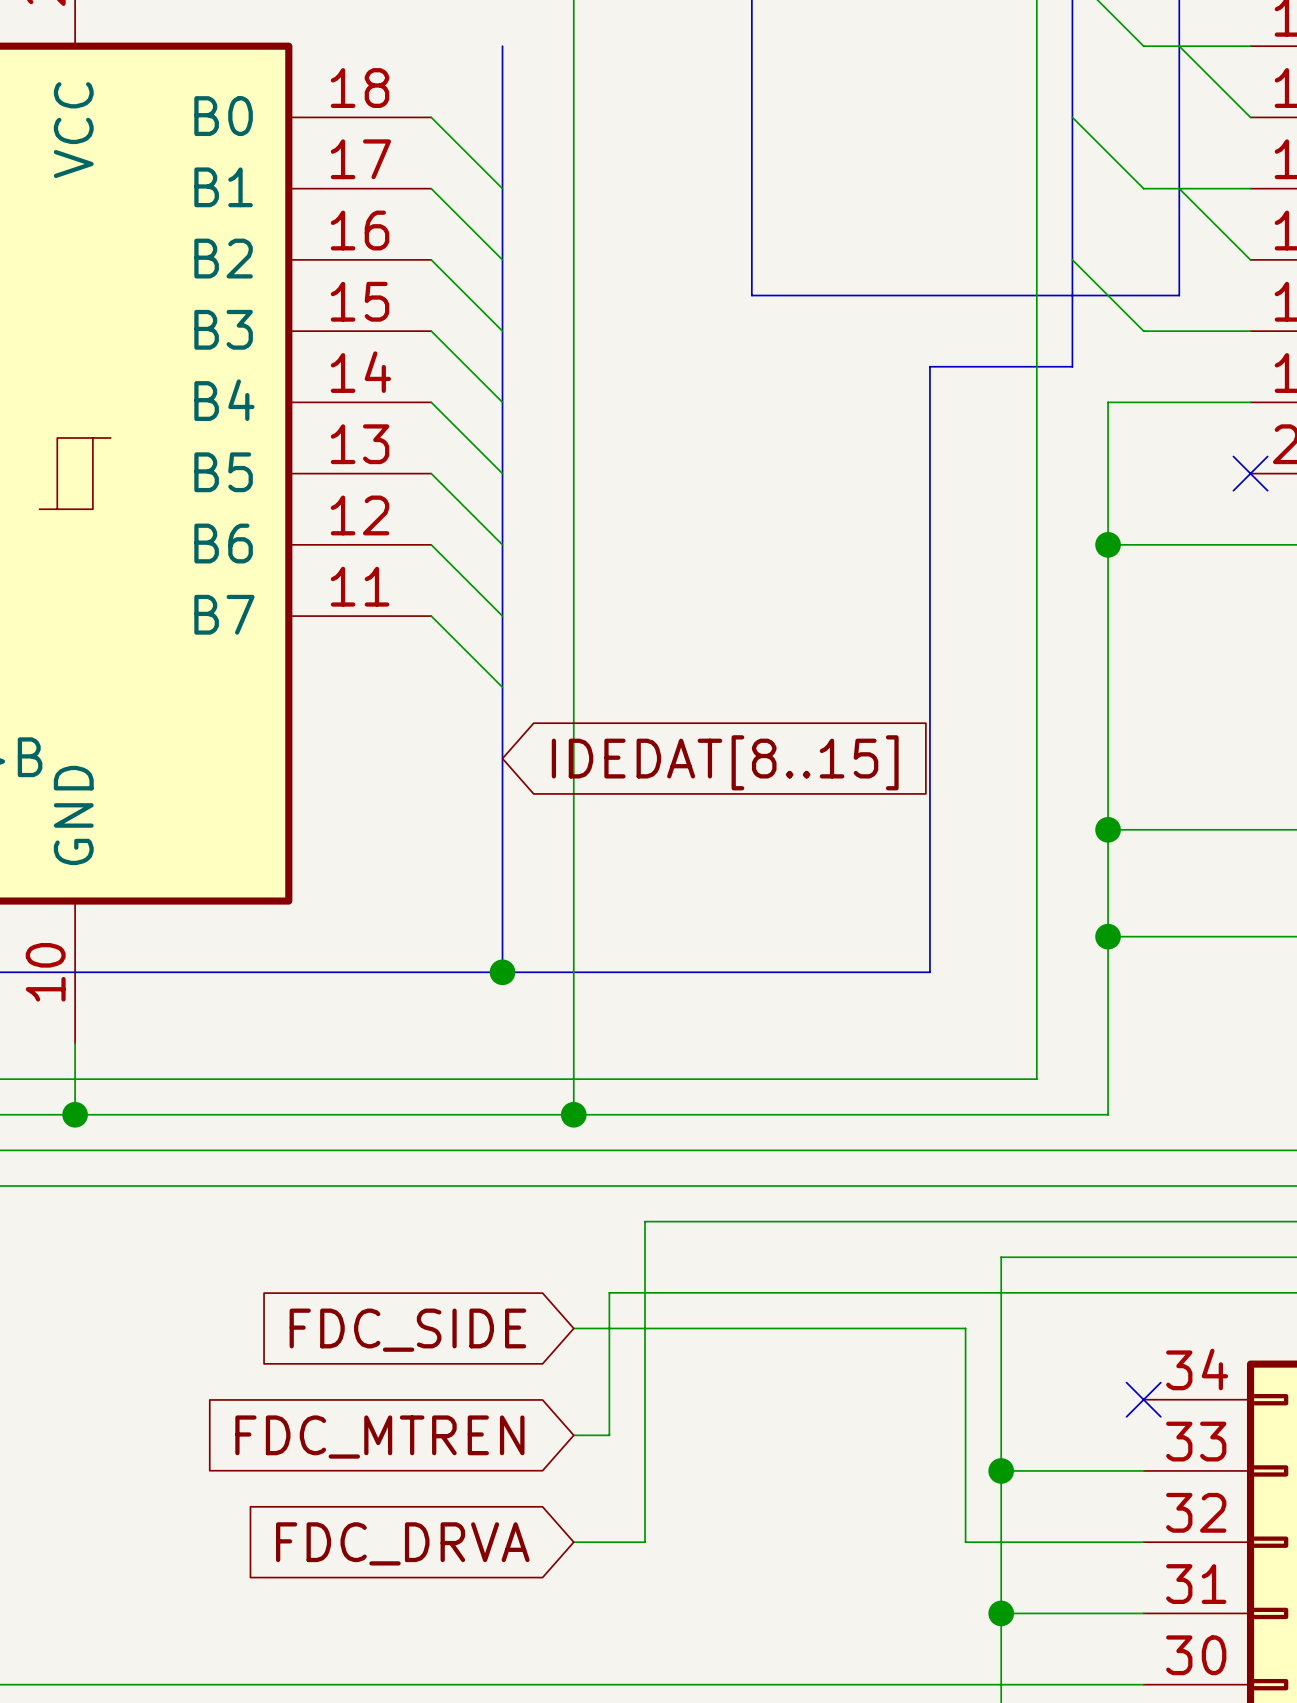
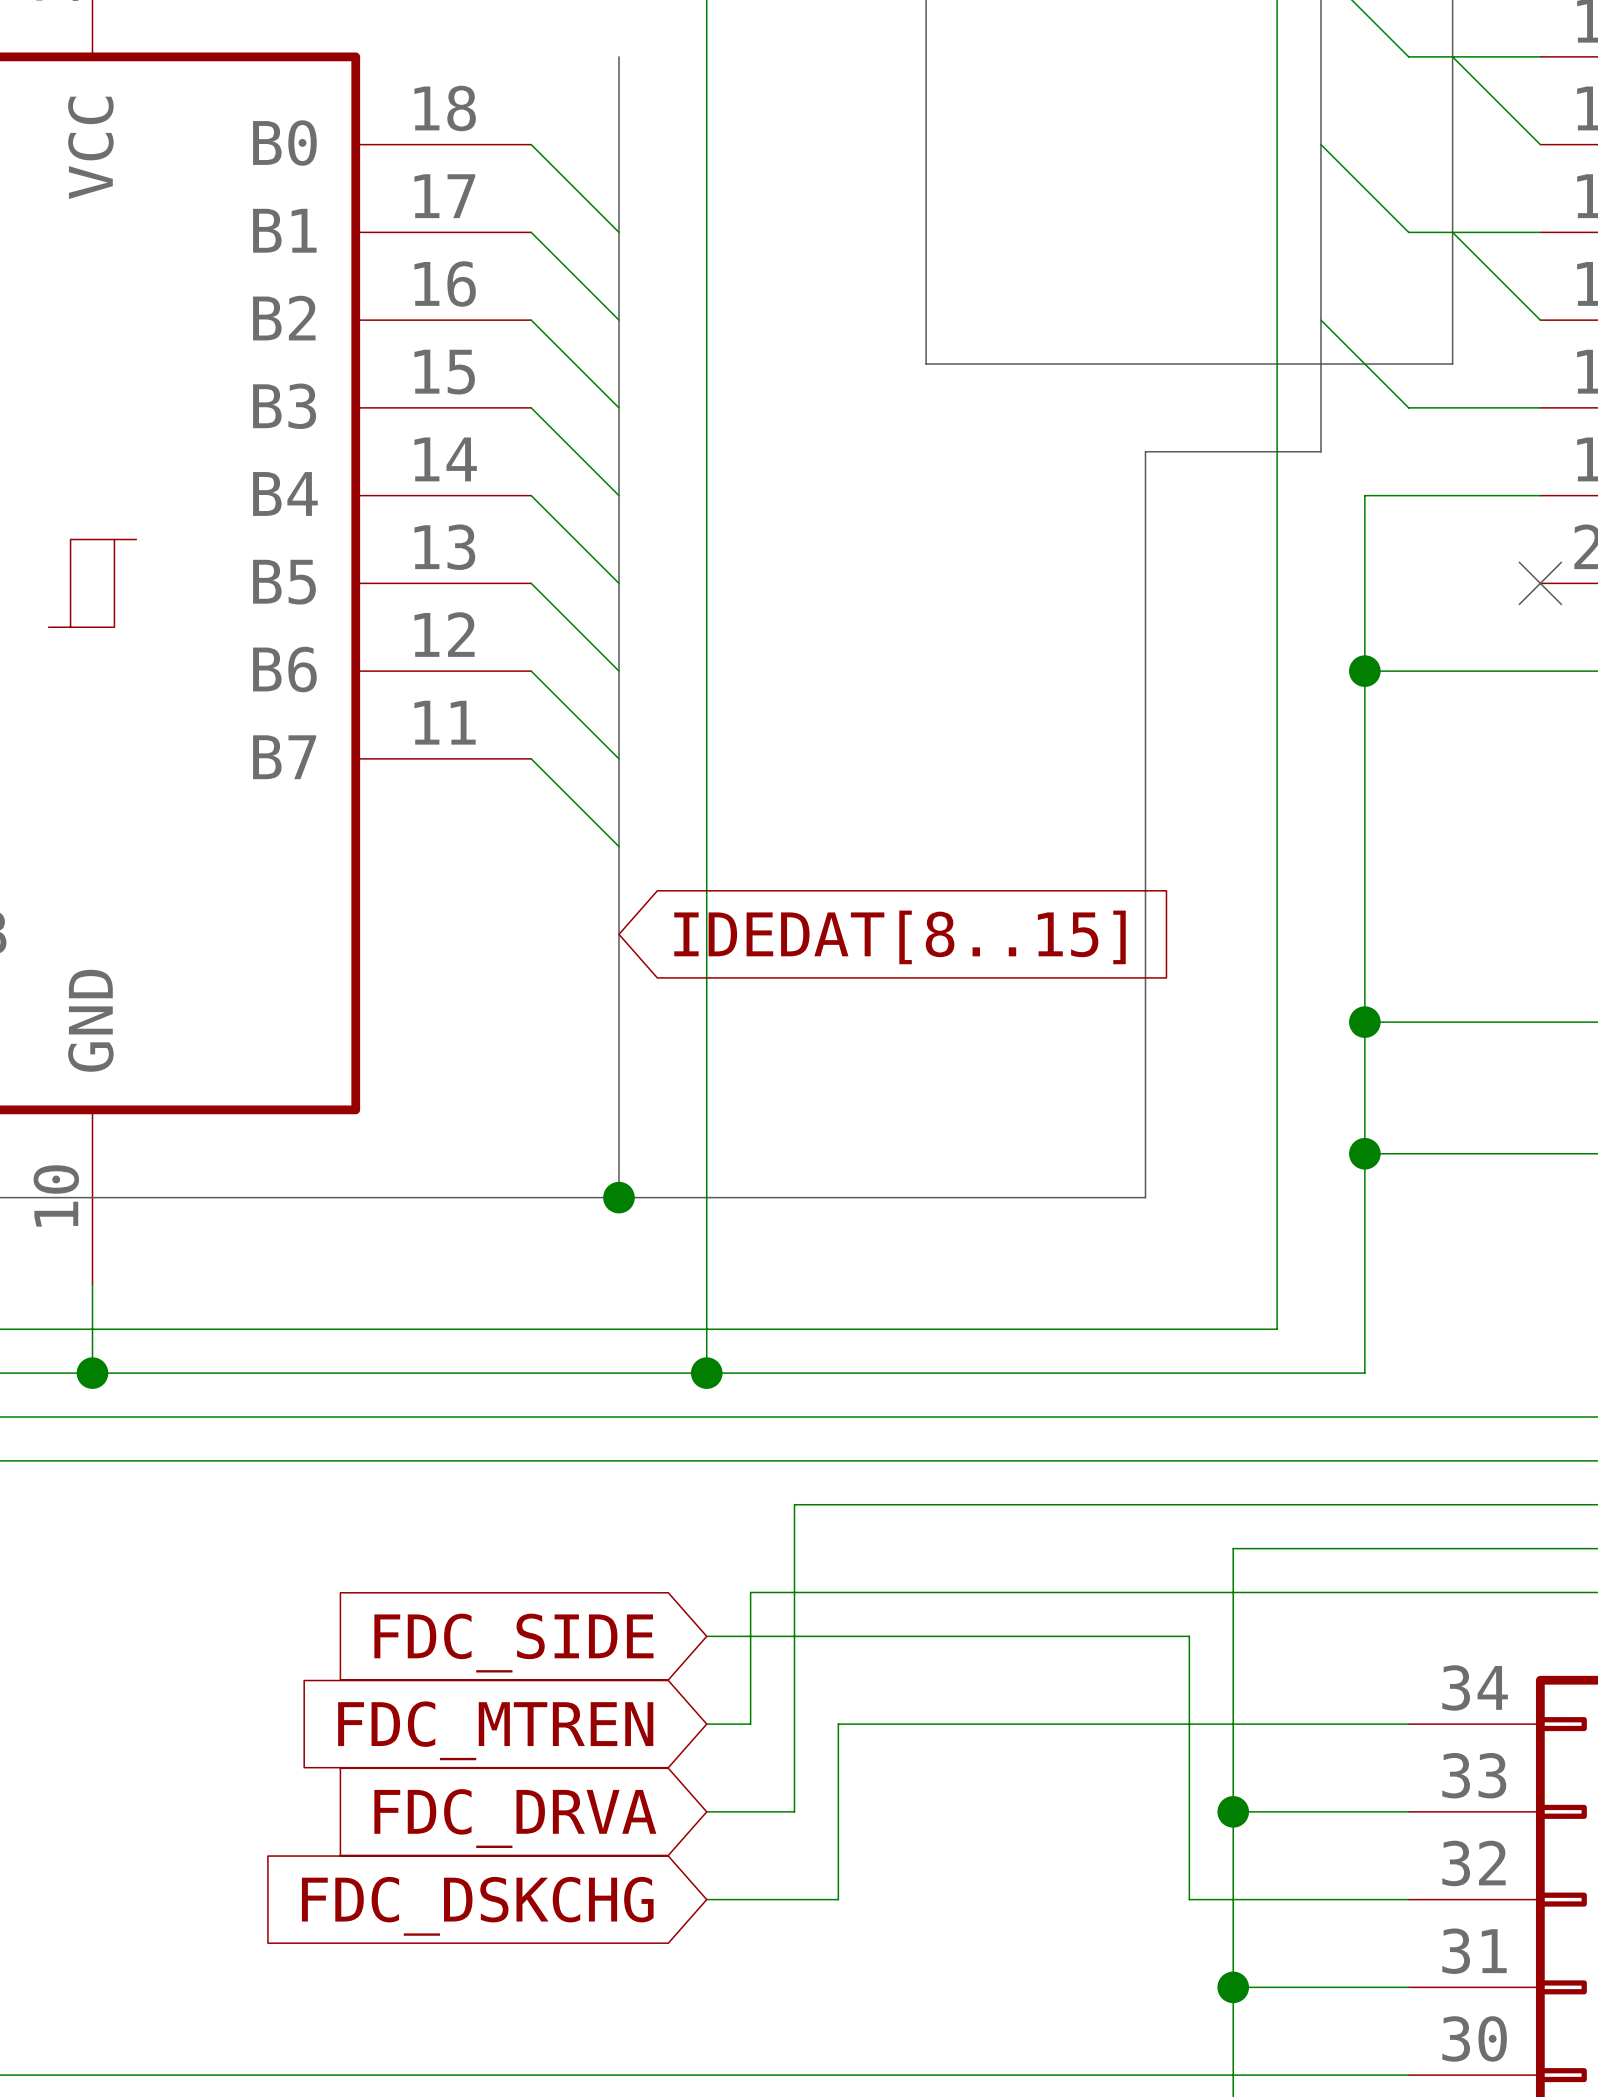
wire: (609, 1399) (609, 1435) (573, 1435) -> (750, 1724) (706, 1724)
wire: none -> (1408, 1724) (838, 1724) (838, 1899) (794, 1899)
no-connect mark: (1143, 1399) -> none
global label position: FDC_MTREN (379, 1437) -> FDC_MTREN (495, 1730)
wire: (645, 1470) (645, 1542) -> (794, 1811) (706, 1811)
global label: none -> FDC_DRVA (515, 1818)
global label: FDC_DRVA (402, 1543) -> FDC_DSKCHG (477, 1906)

